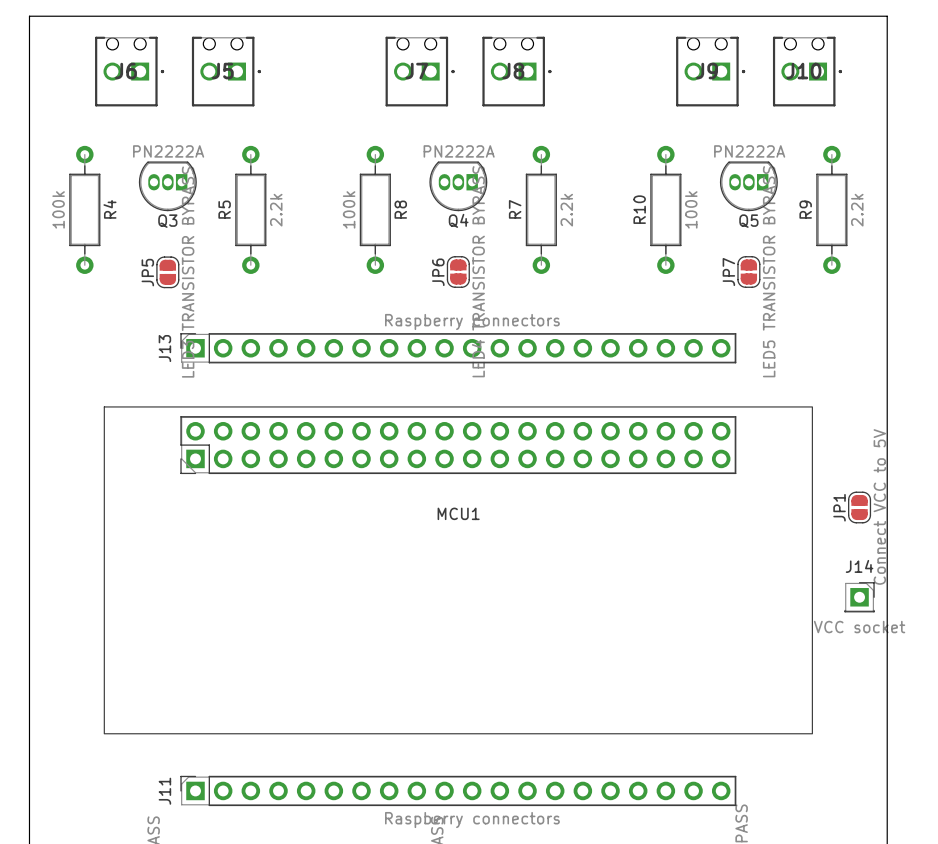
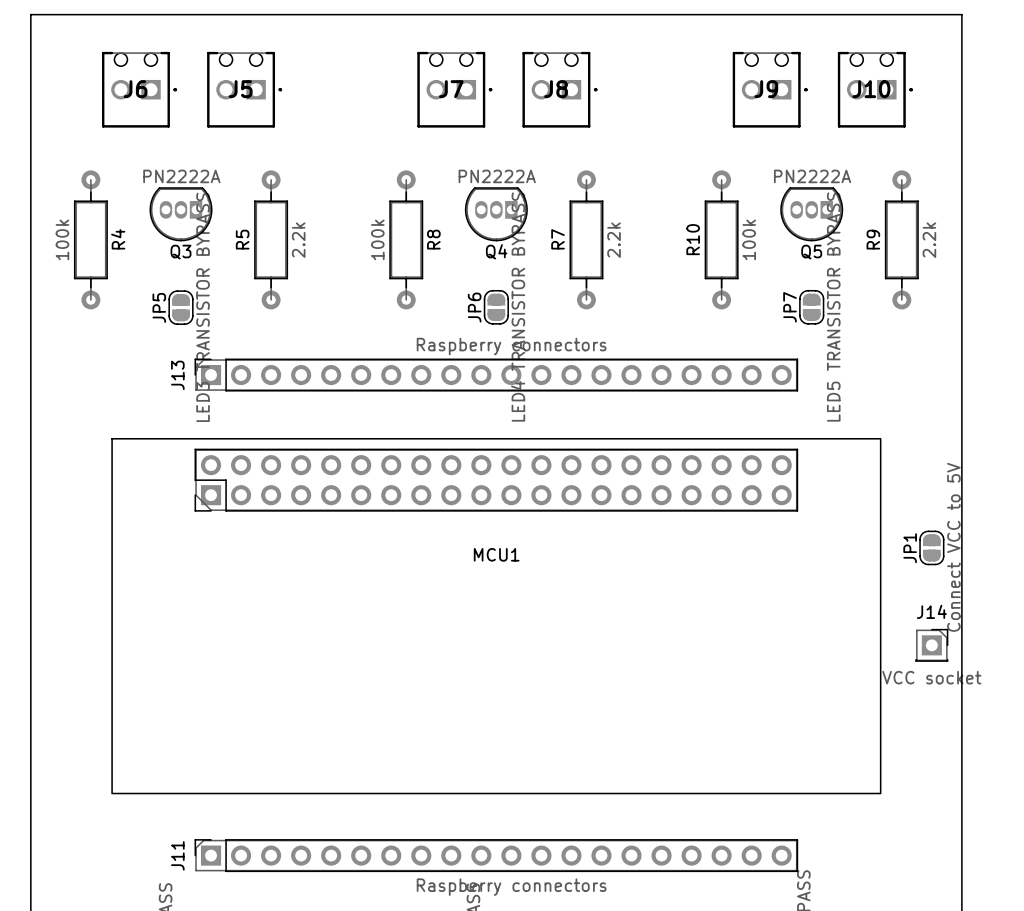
J6 position: (129, 71) -> (139, 89)
J5 position: (226, 71) -> (244, 89)
J7 position: (420, 71) -> (454, 89)
J8 position: (516, 71) -> (559, 89)
J9 position: (710, 71) -> (770, 89)
J10 position: (807, 71) -> (875, 89)
Q3 position: (167, 186) -> (181, 214)
Q4 position: (458, 186) -> (496, 214)
Q5 position: (748, 186) -> (811, 214)
R4 position: (84, 209) -> (90, 239)
R5 position: (250, 209) -> (271, 239)
R8 position: (375, 209) -> (406, 239)
R7 position: (541, 209) -> (586, 239)
R10 position: (665, 209) -> (721, 239)
R9 position: (831, 209) -> (901, 239)
JP6 position: (458, 271) -> (496, 307)
JP7 position: (748, 271) -> (811, 307)
JP5 position: (167, 272) -> (181, 307)

